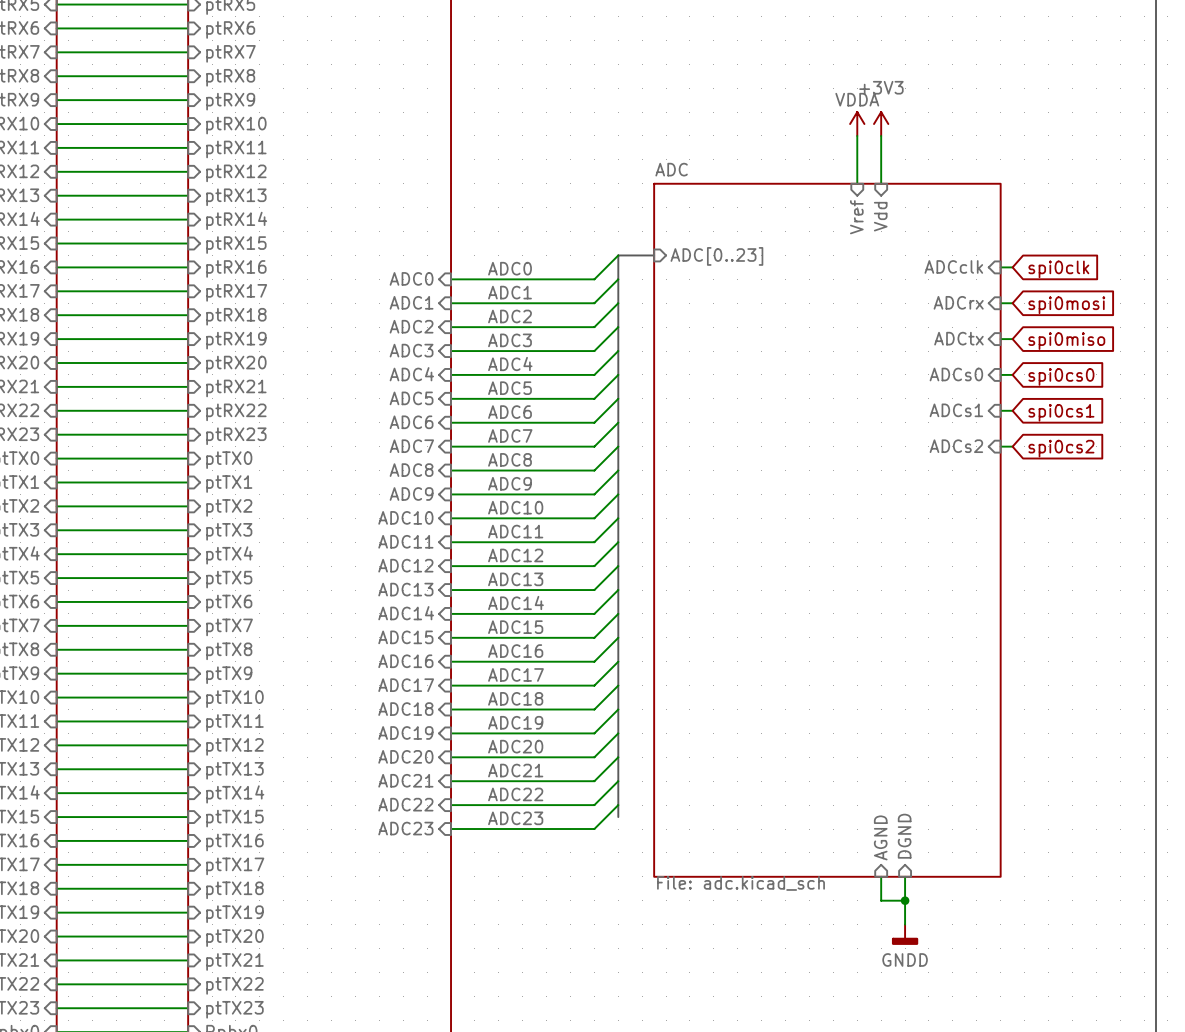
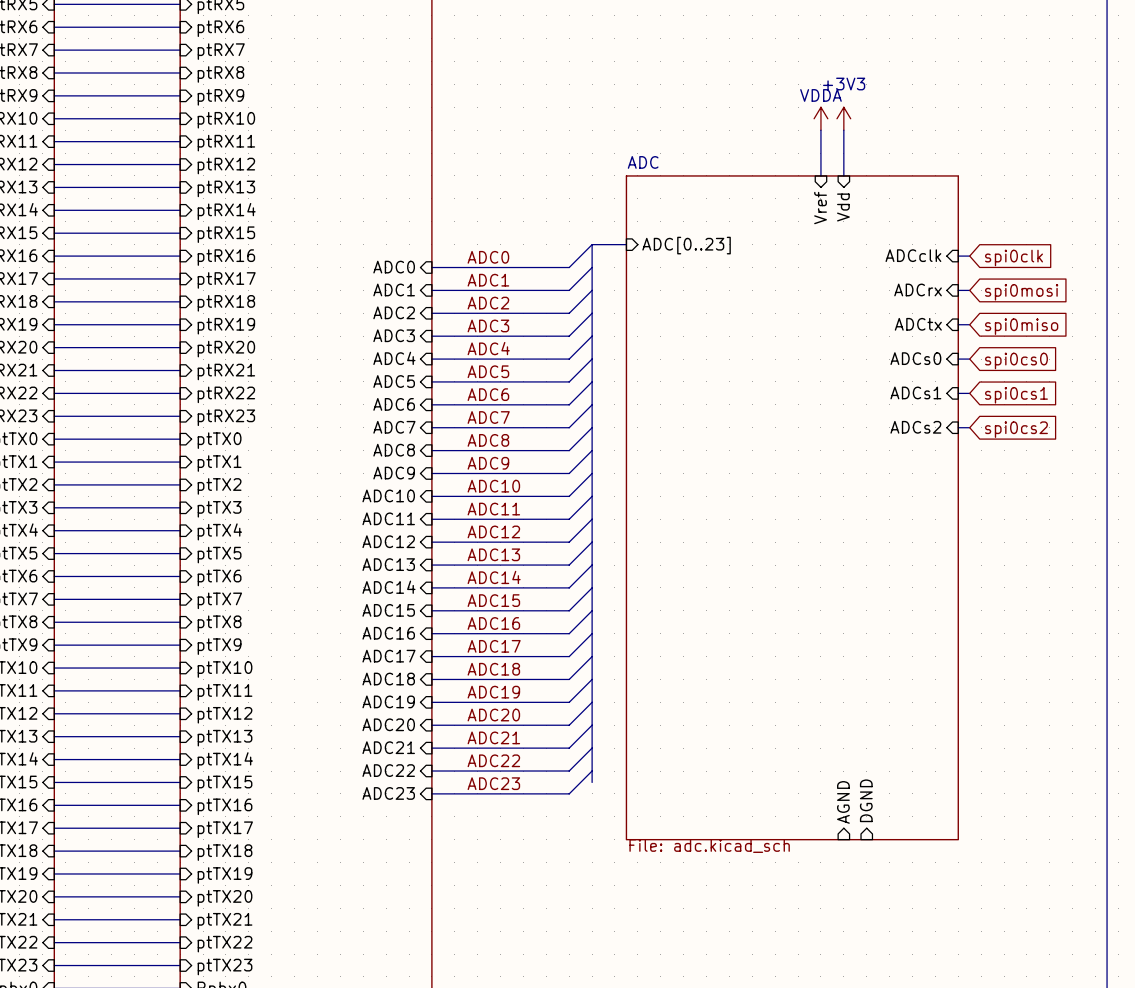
wire: (881, 876) (881, 900) (905, 900) -> none
wire: (905, 876) (905, 924) -> none
junction: (905, 900) -> none
power symbol: GNDD (905, 934) -> none

